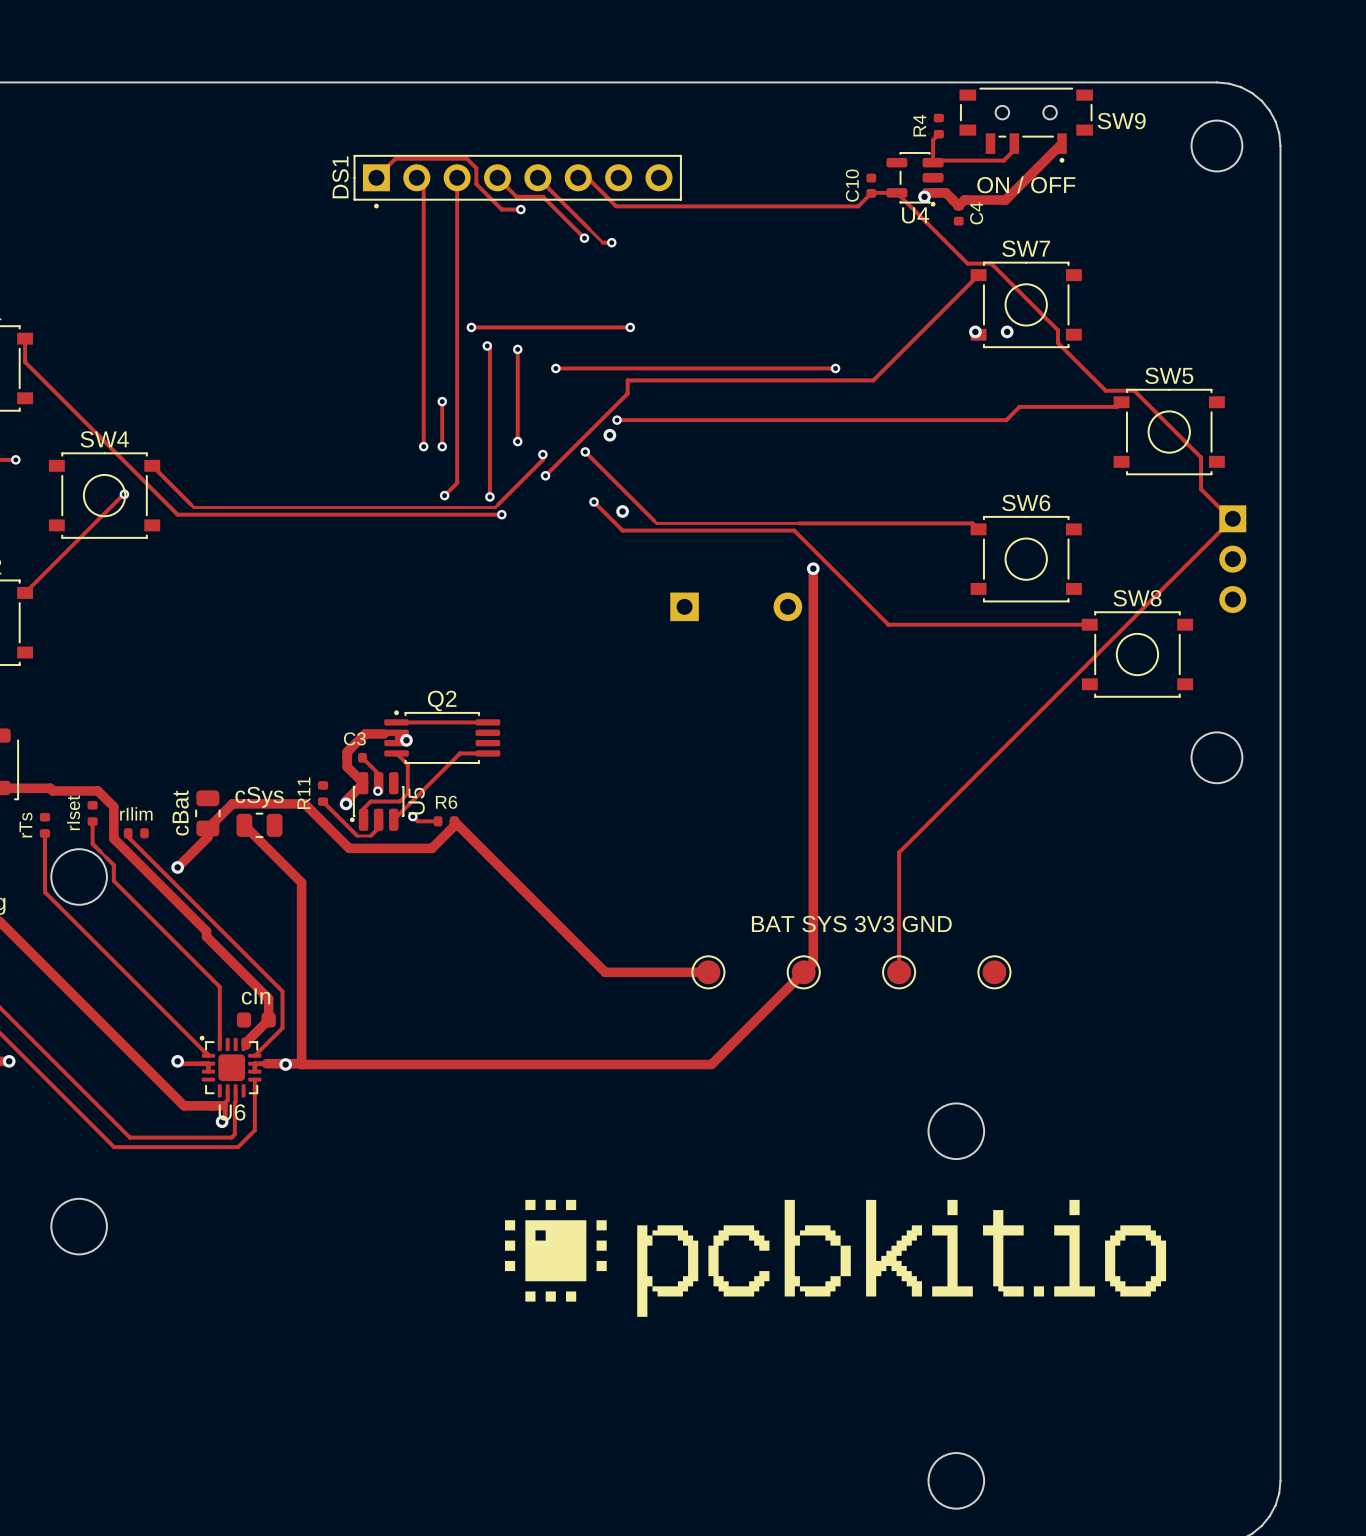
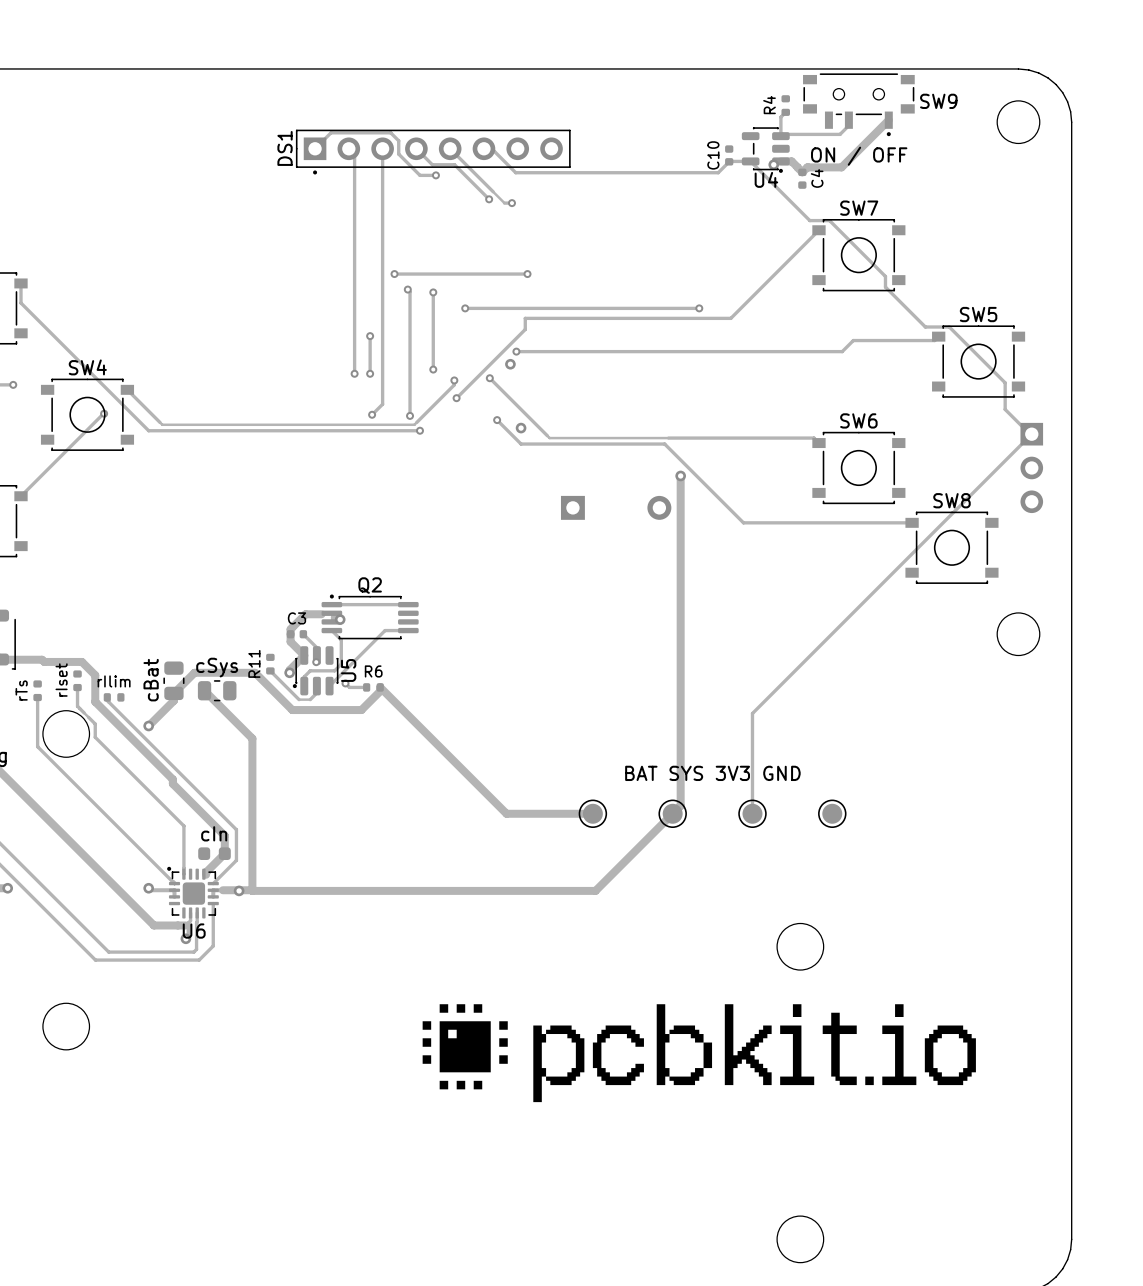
via: (975, 331) -> none
via: (1007, 331) -> none

